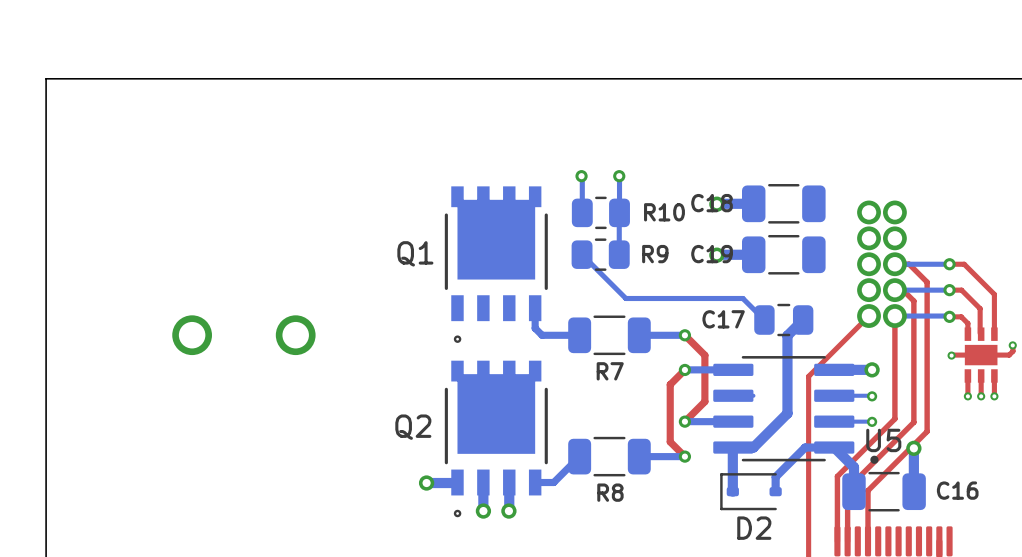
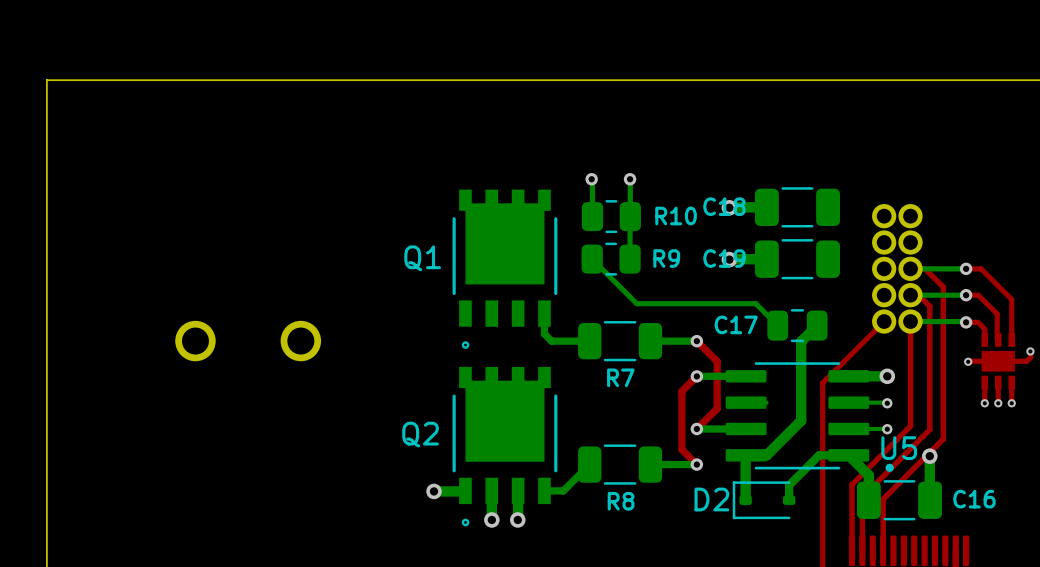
D2 name position: D2 (754, 528) -> D2 (711, 499)

